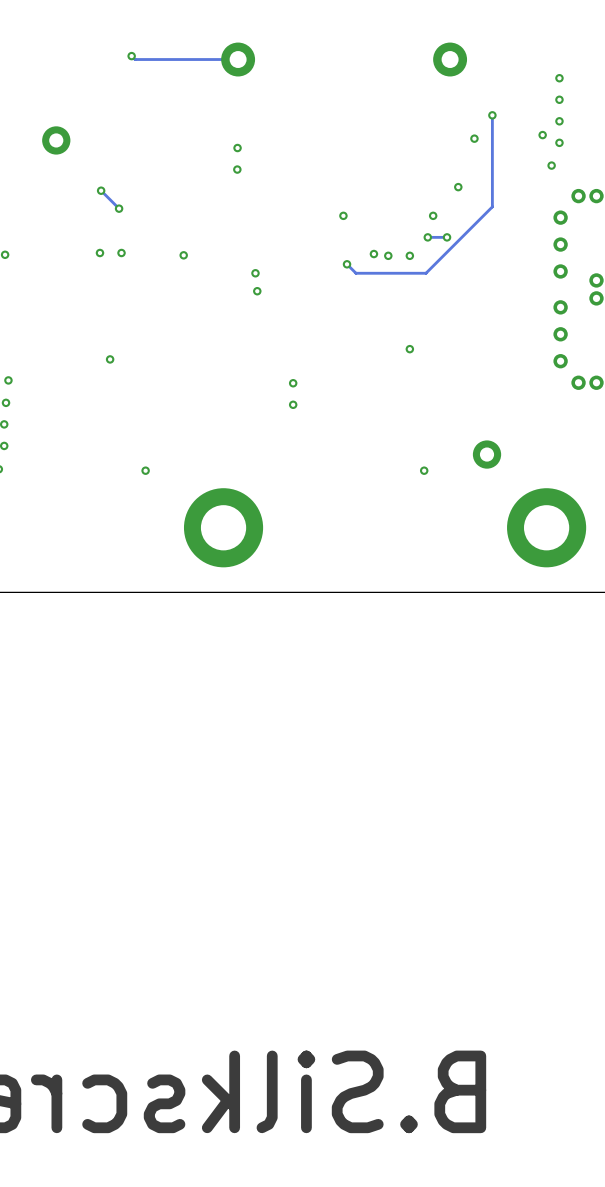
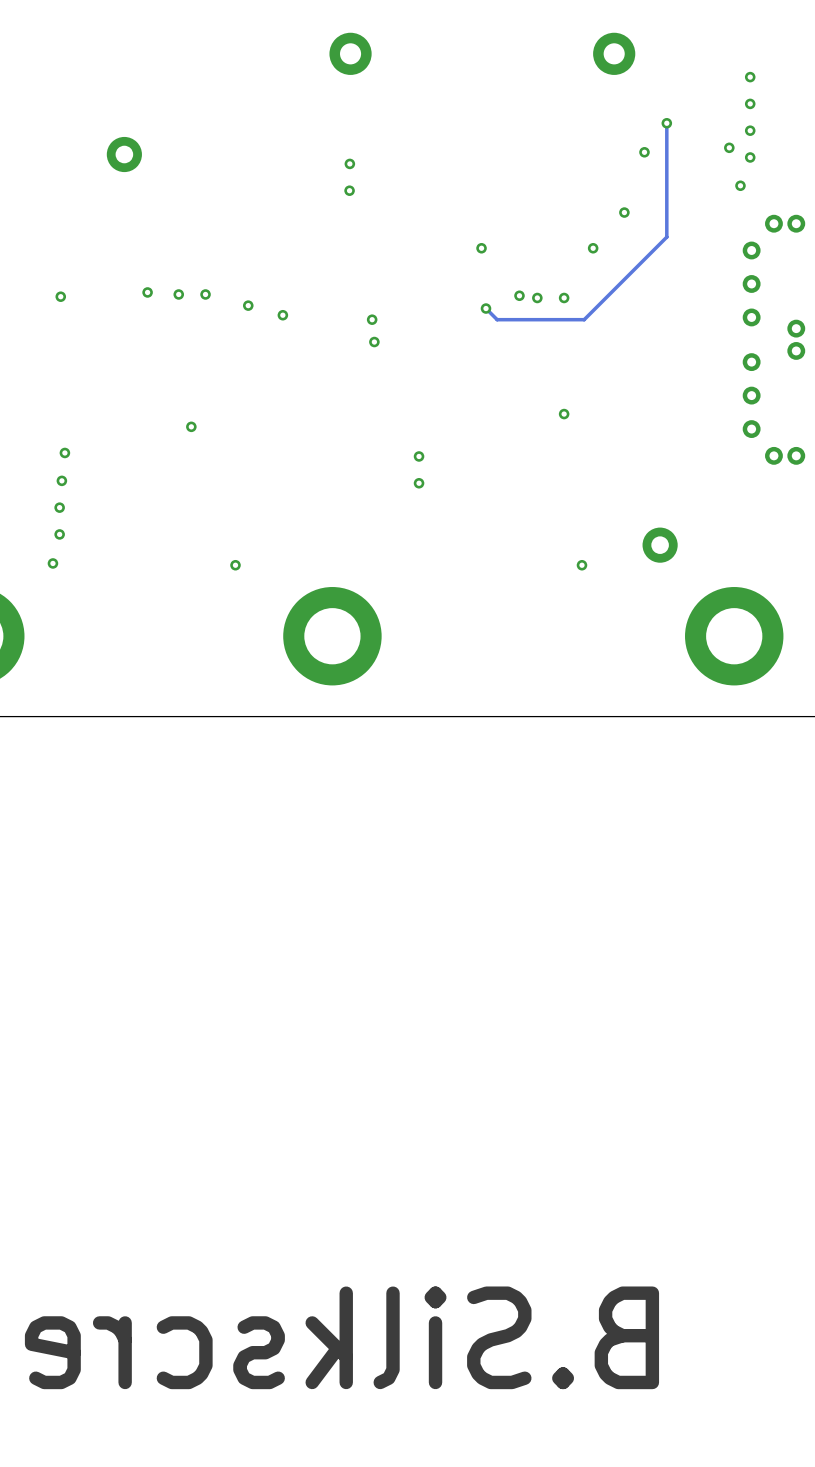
track: (131, 56) (135, 59) (238, 59) -> none
via: (131, 56) -> none
track: (101, 190) (119, 208) -> none
via: (101, 190) -> none
via: (119, 208) -> none
via: (427, 237) -> none
track: (447, 237) (427, 237) -> none
via: (447, 237) -> none
via: none -> (147, 292)
via: (183, 255) -> none
via: none -> (248, 305)
via: none -> (282, 315)

